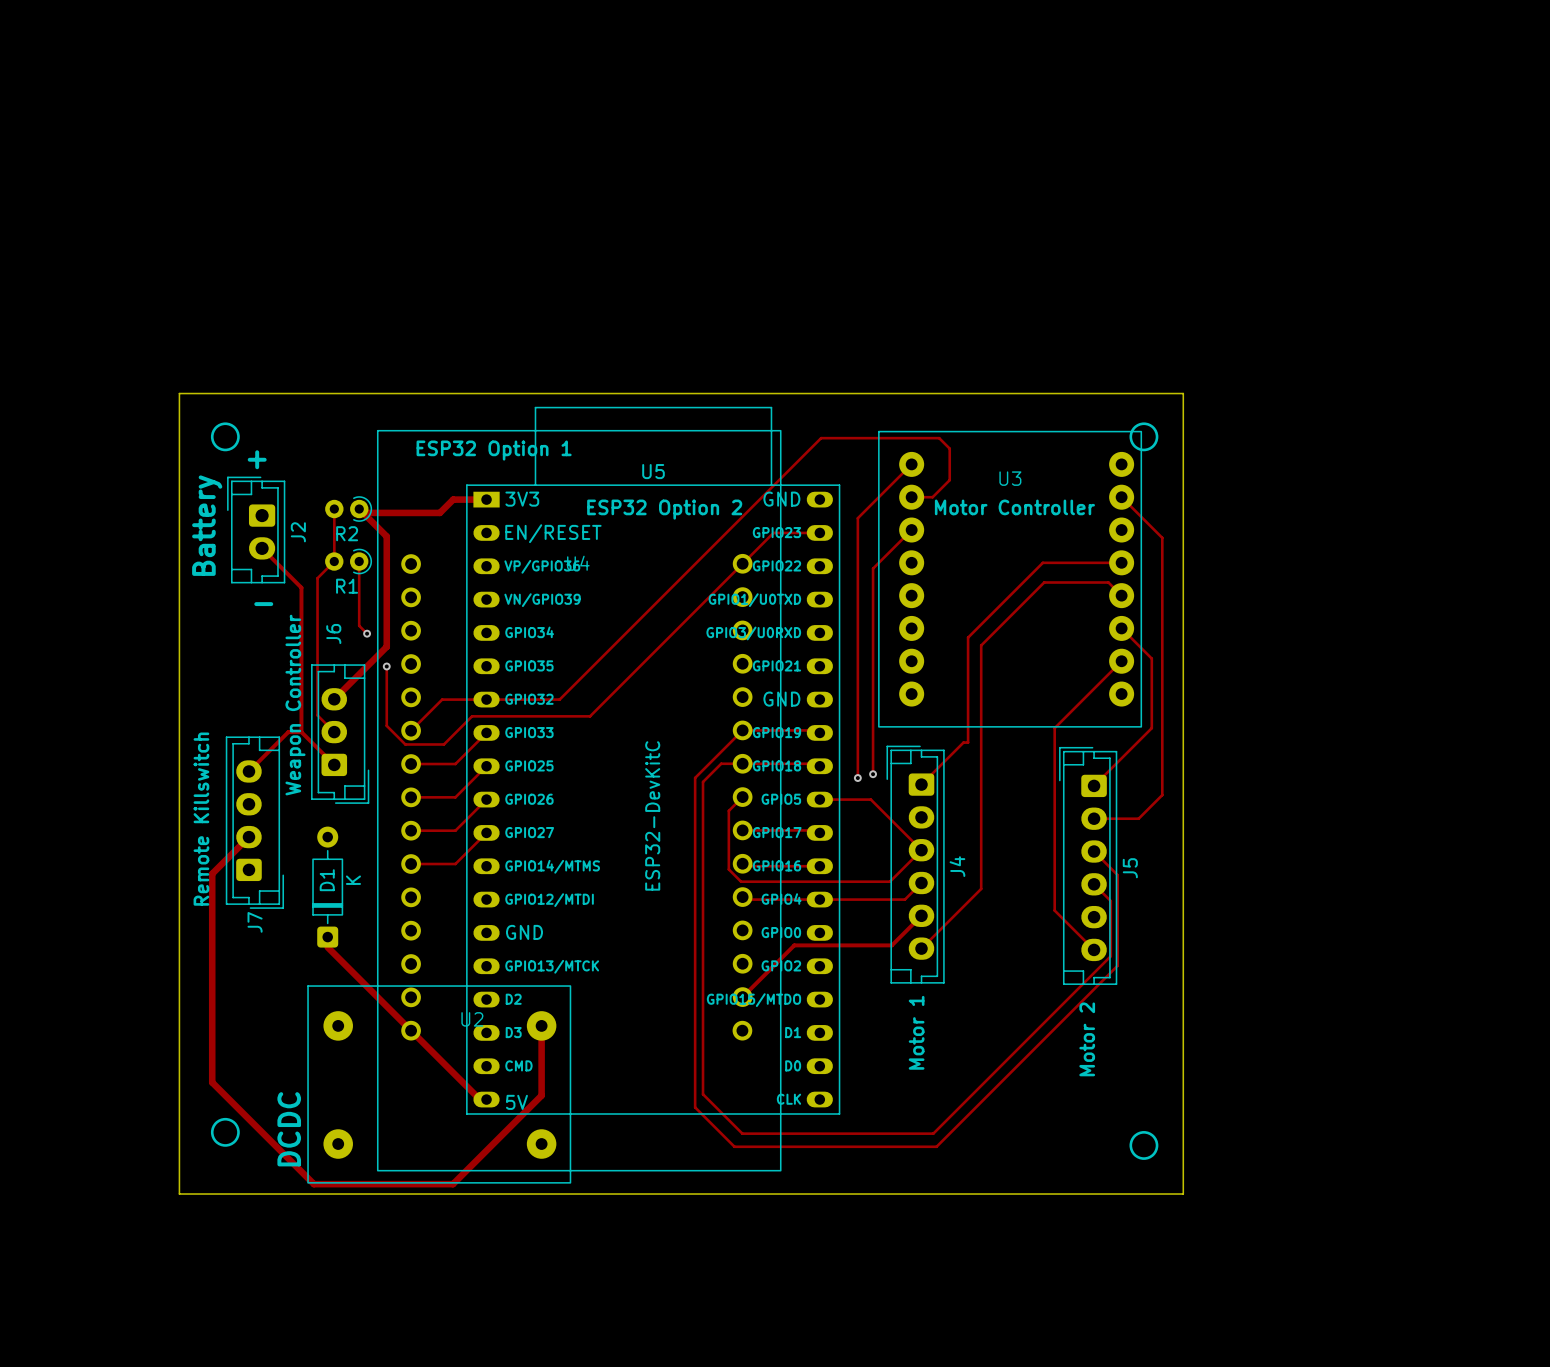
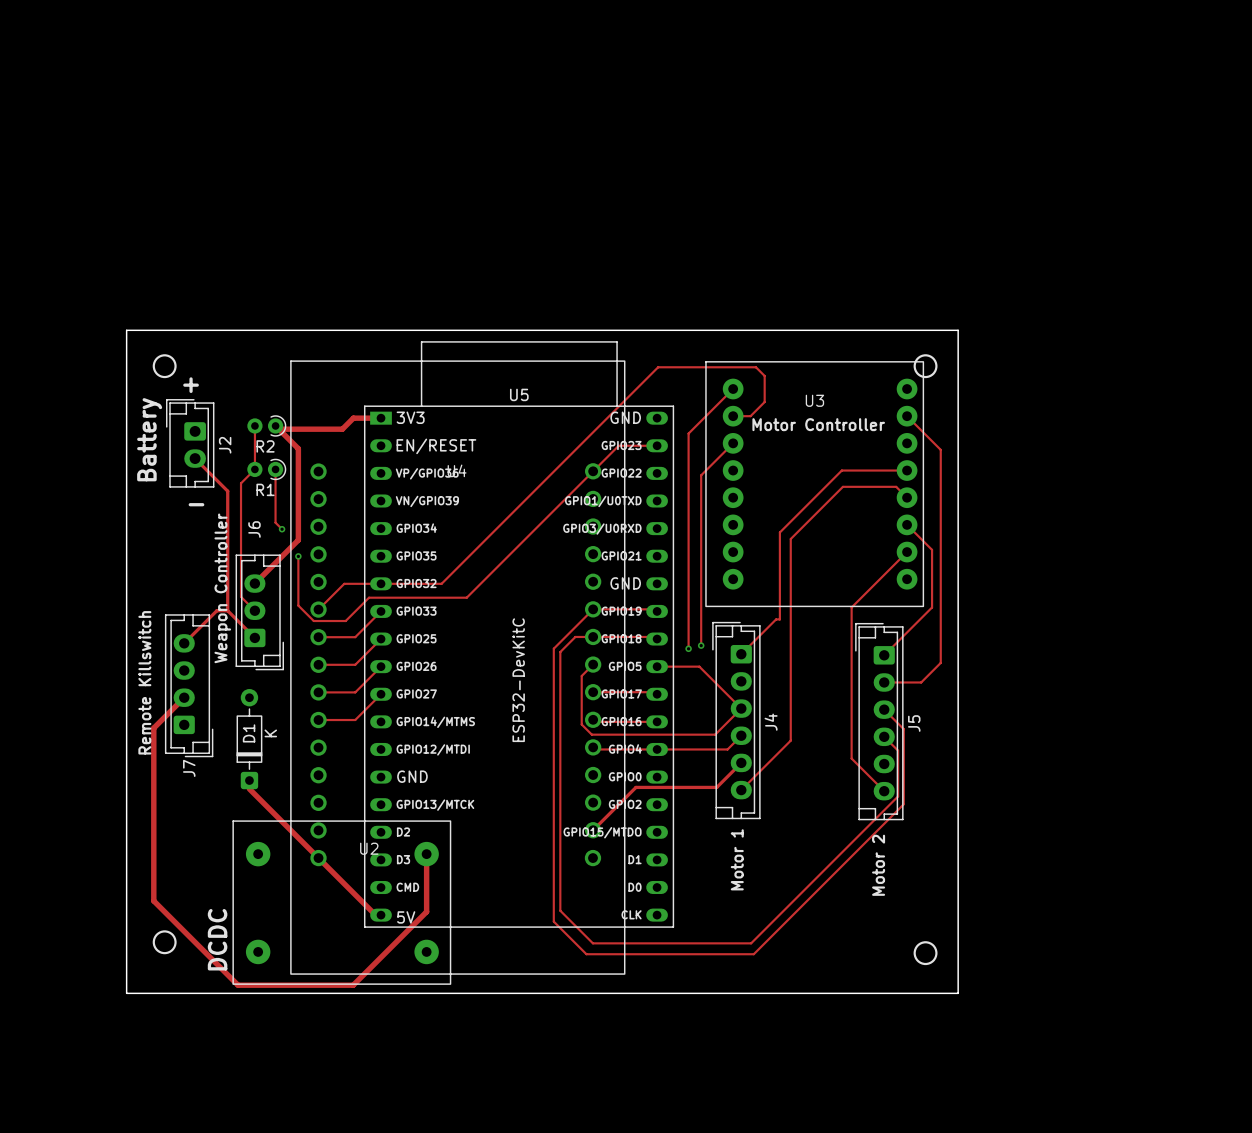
text: ESP32 Option 1 (494, 450) -> none
text: ESP32 Option 2 (664, 509) -> none

